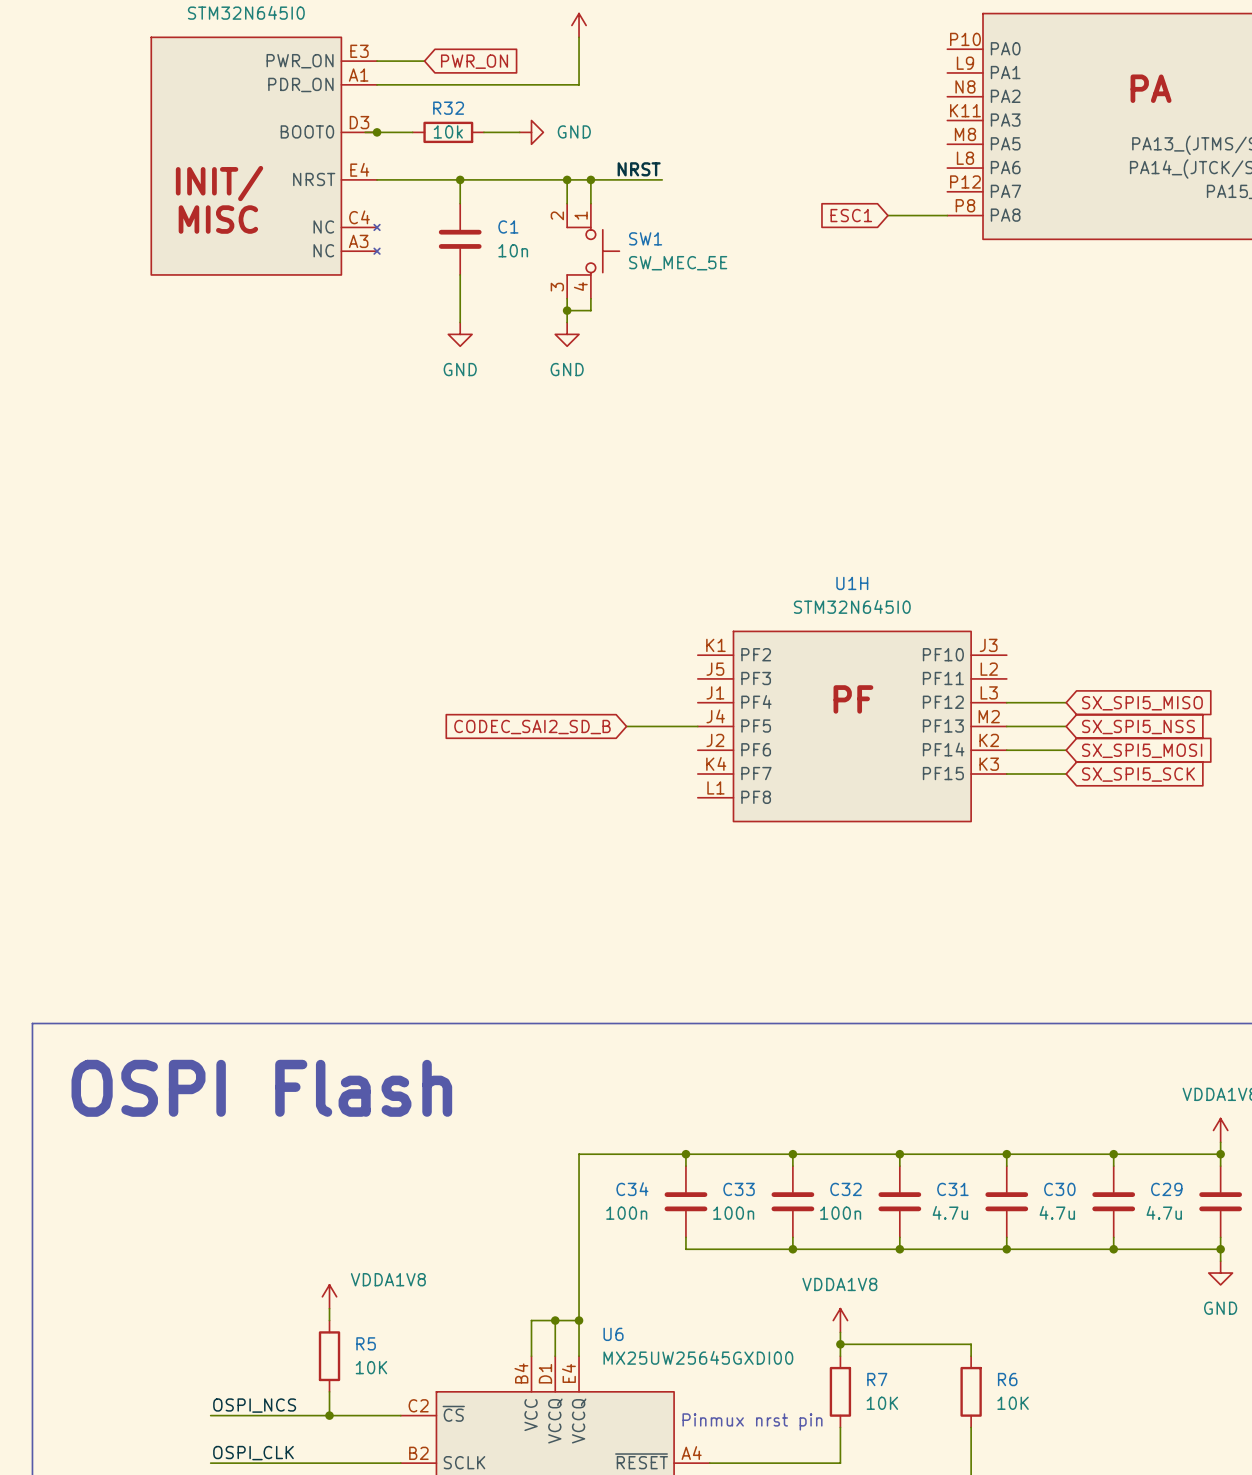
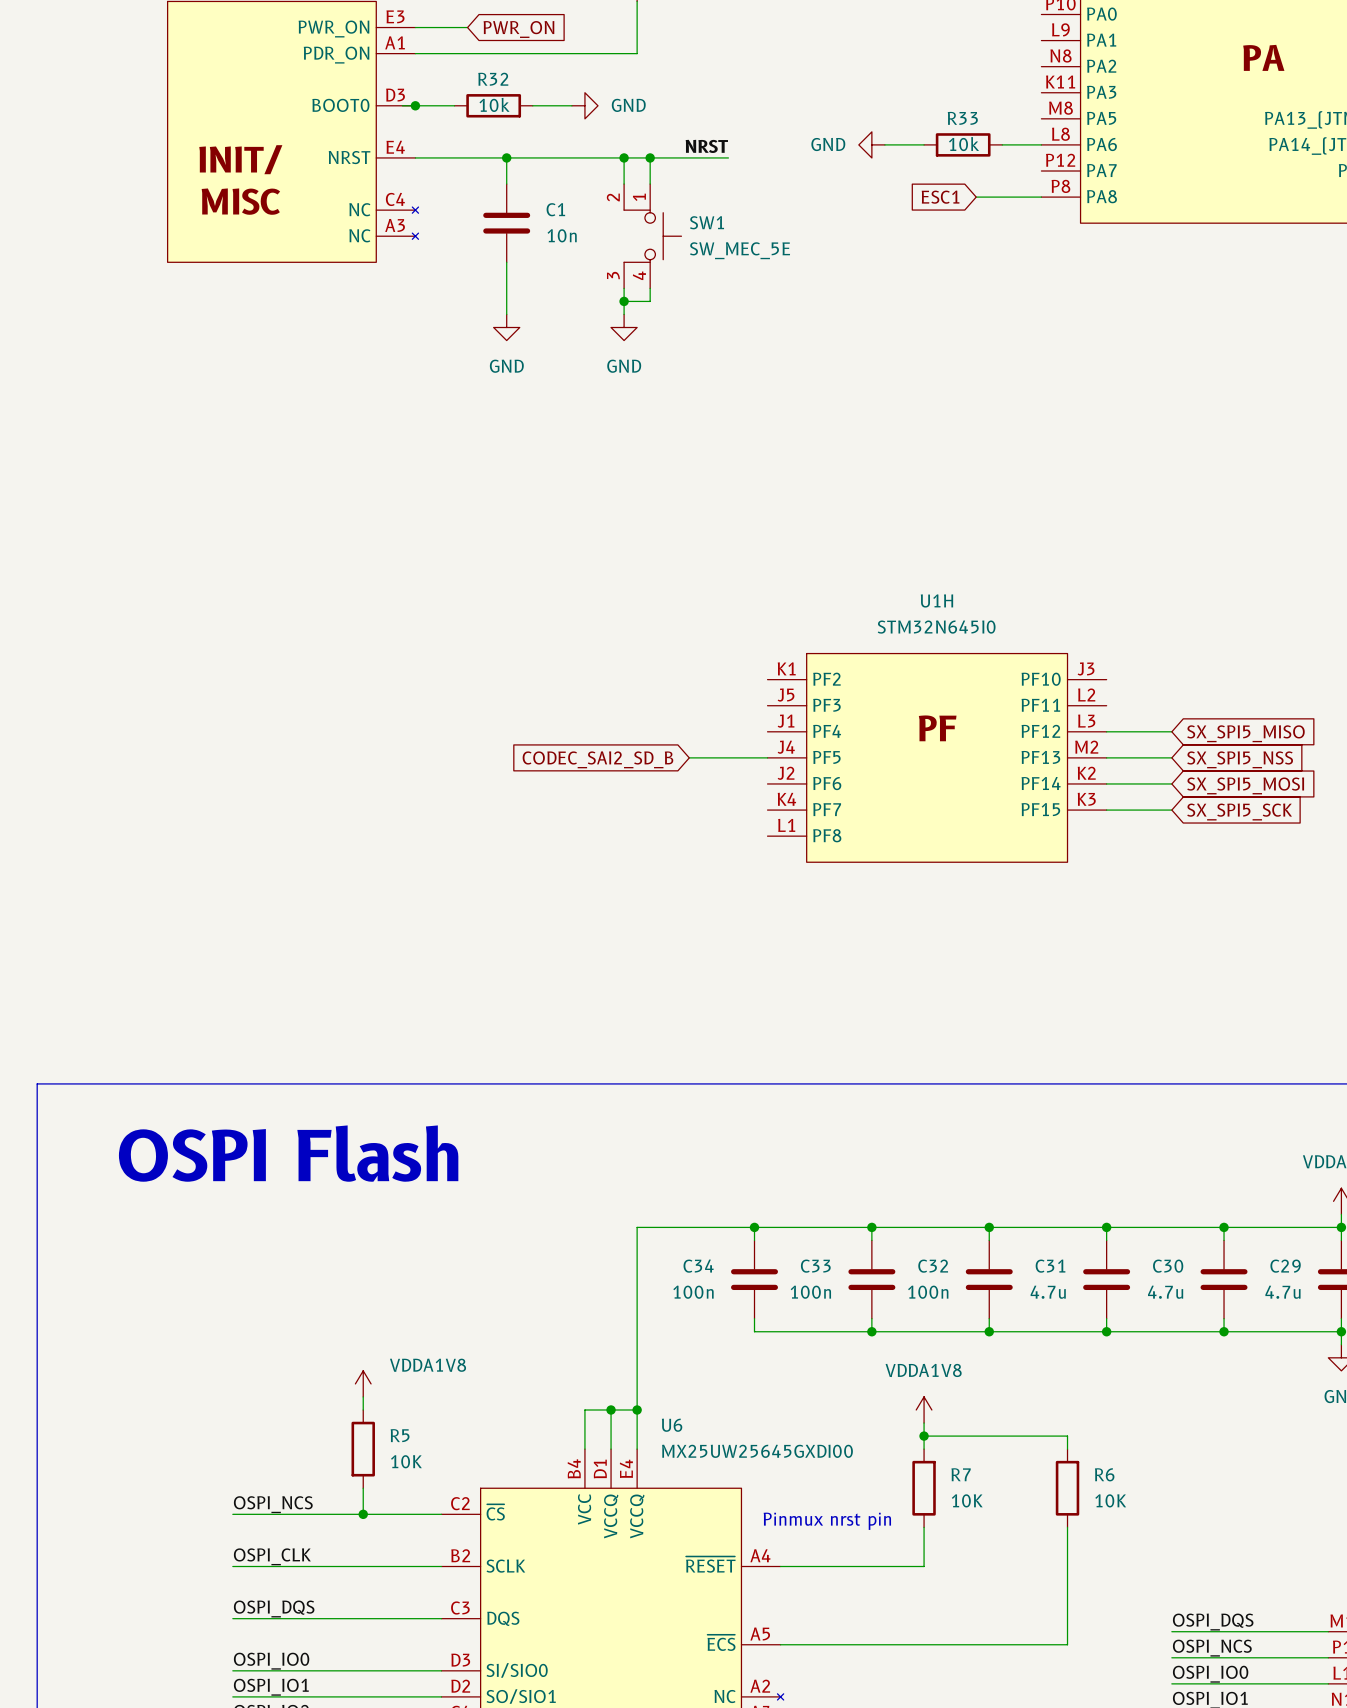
power symbol: none -> GND (871, 144)
wire: none -> (884, 144) (924, 144)
R33: none -> 10k (963, 144)
wire: none -> (1002, 144) (1041, 144)

